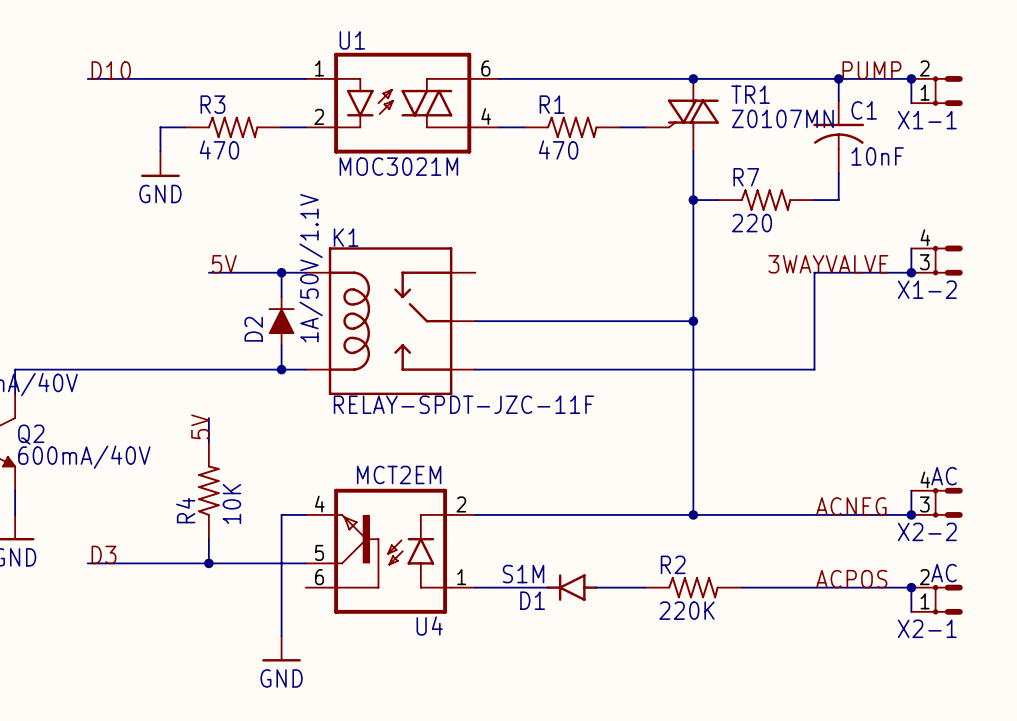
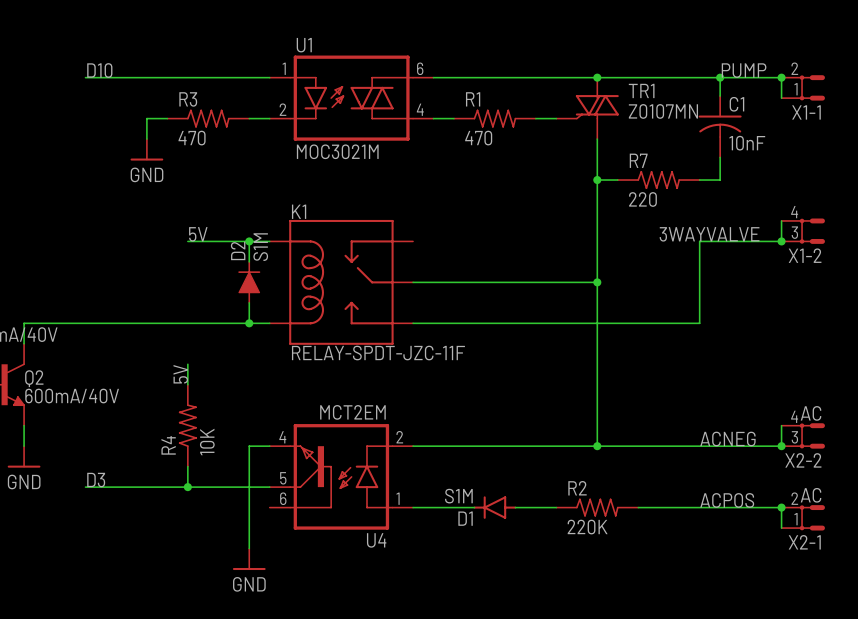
D2 value: 1A/50V/1.1V (311, 268) -> S1M (260, 247)
D2 name position: D2 (253, 329) -> D2 (238, 250)

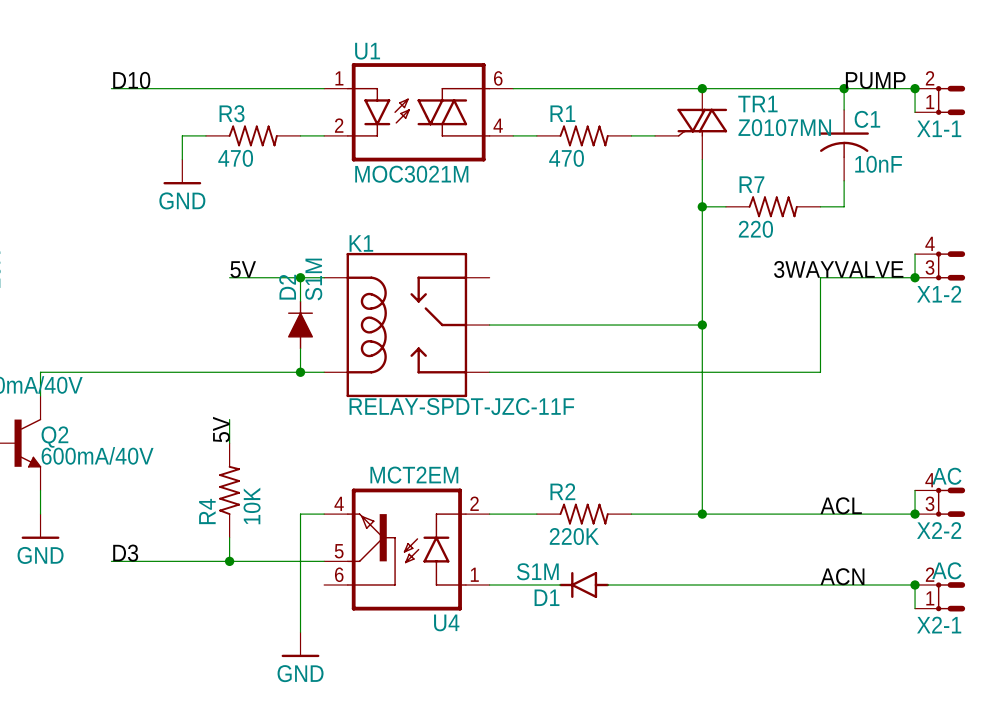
label: ACNEG (727, 439) -> ACL (841, 505)
label: ACPOS (727, 500) -> ACN (842, 576)
R2 position: (597, 507) -> (584, 514)

